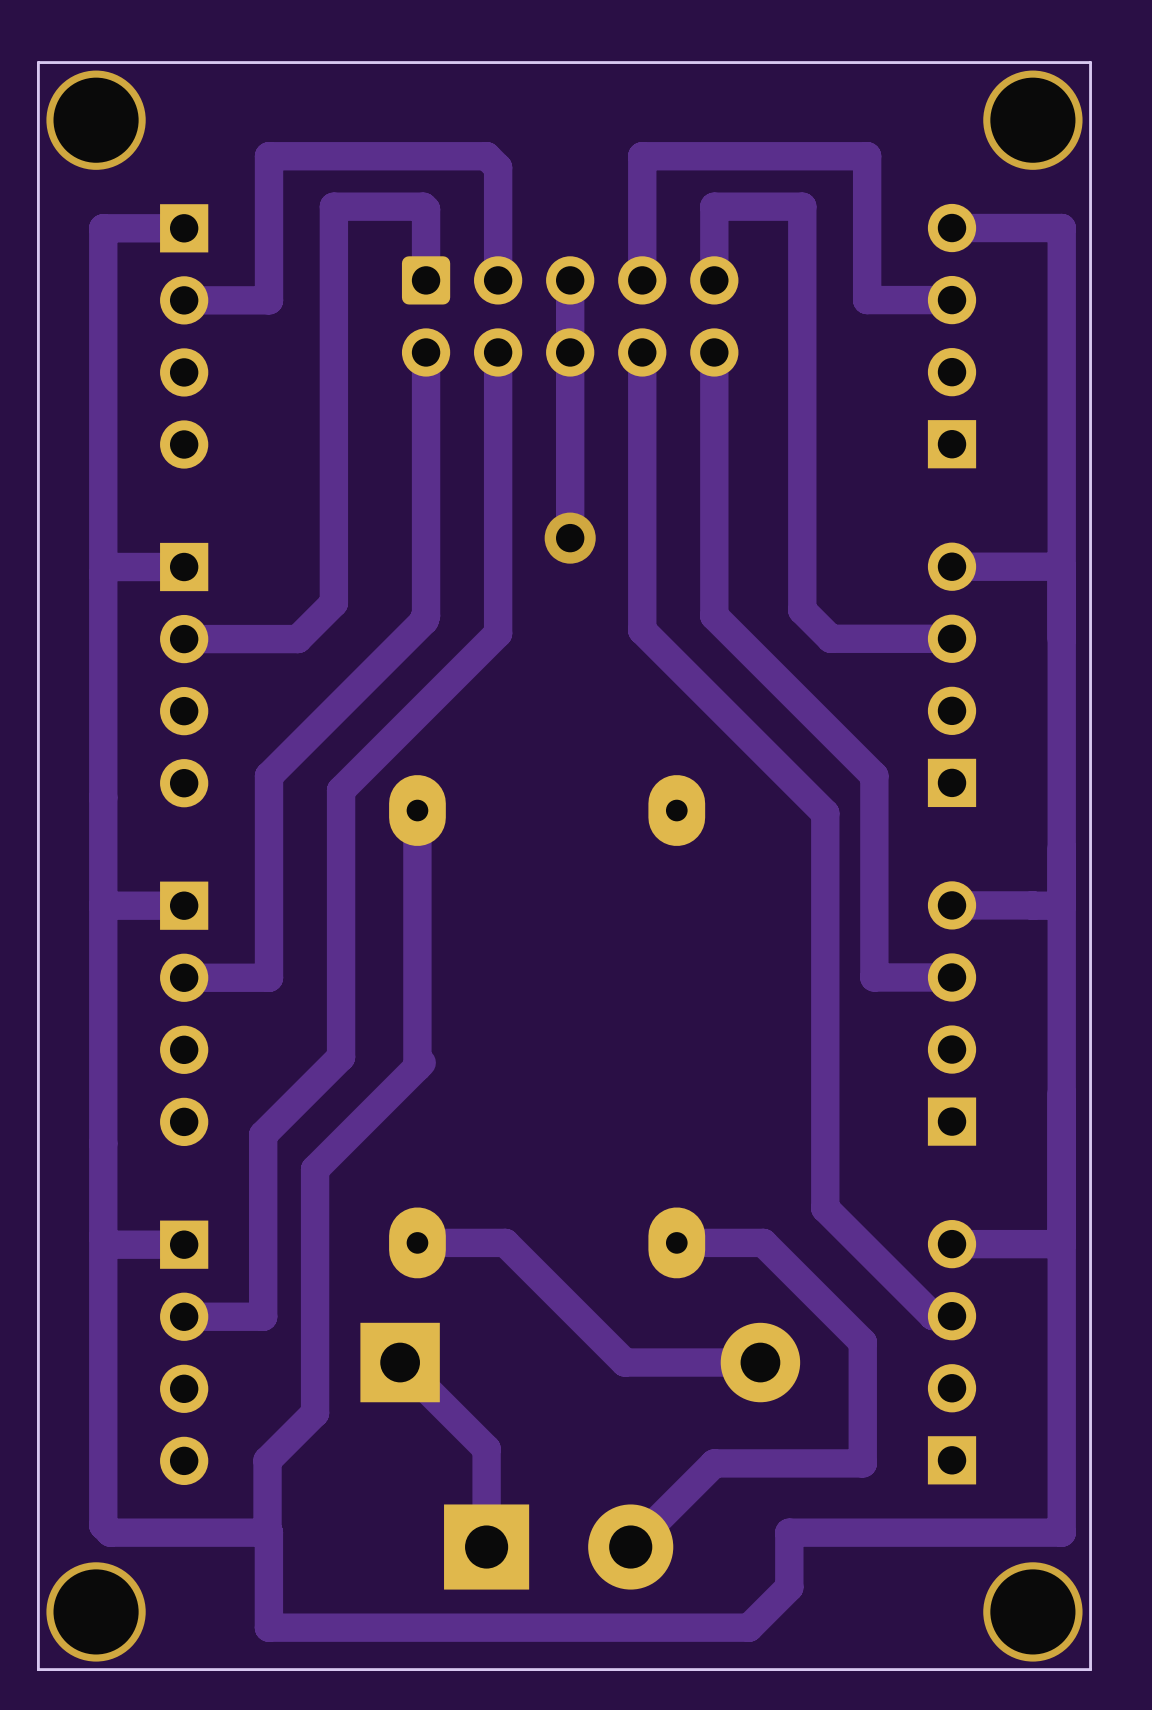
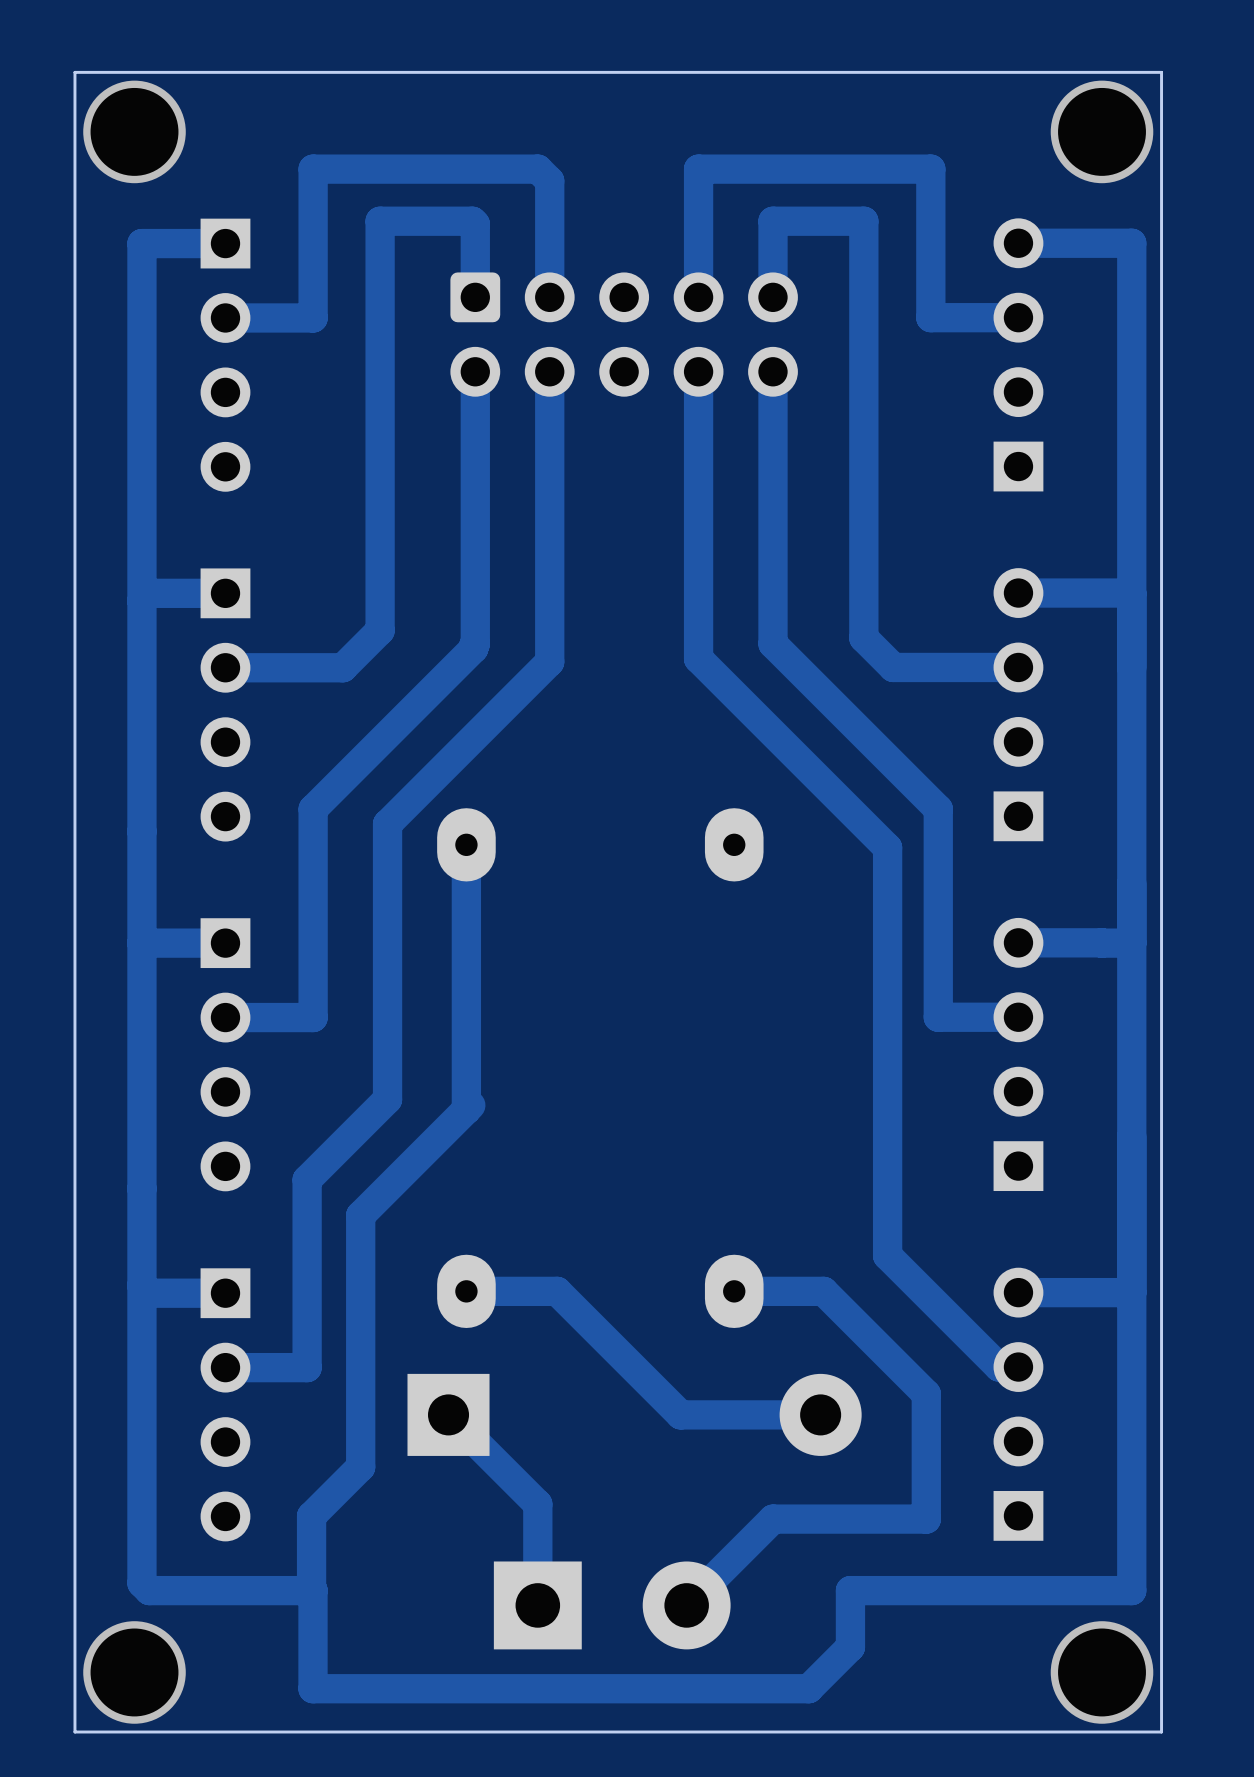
track: (570, 280) (570, 538) -> none
via: (570, 538) -> none

